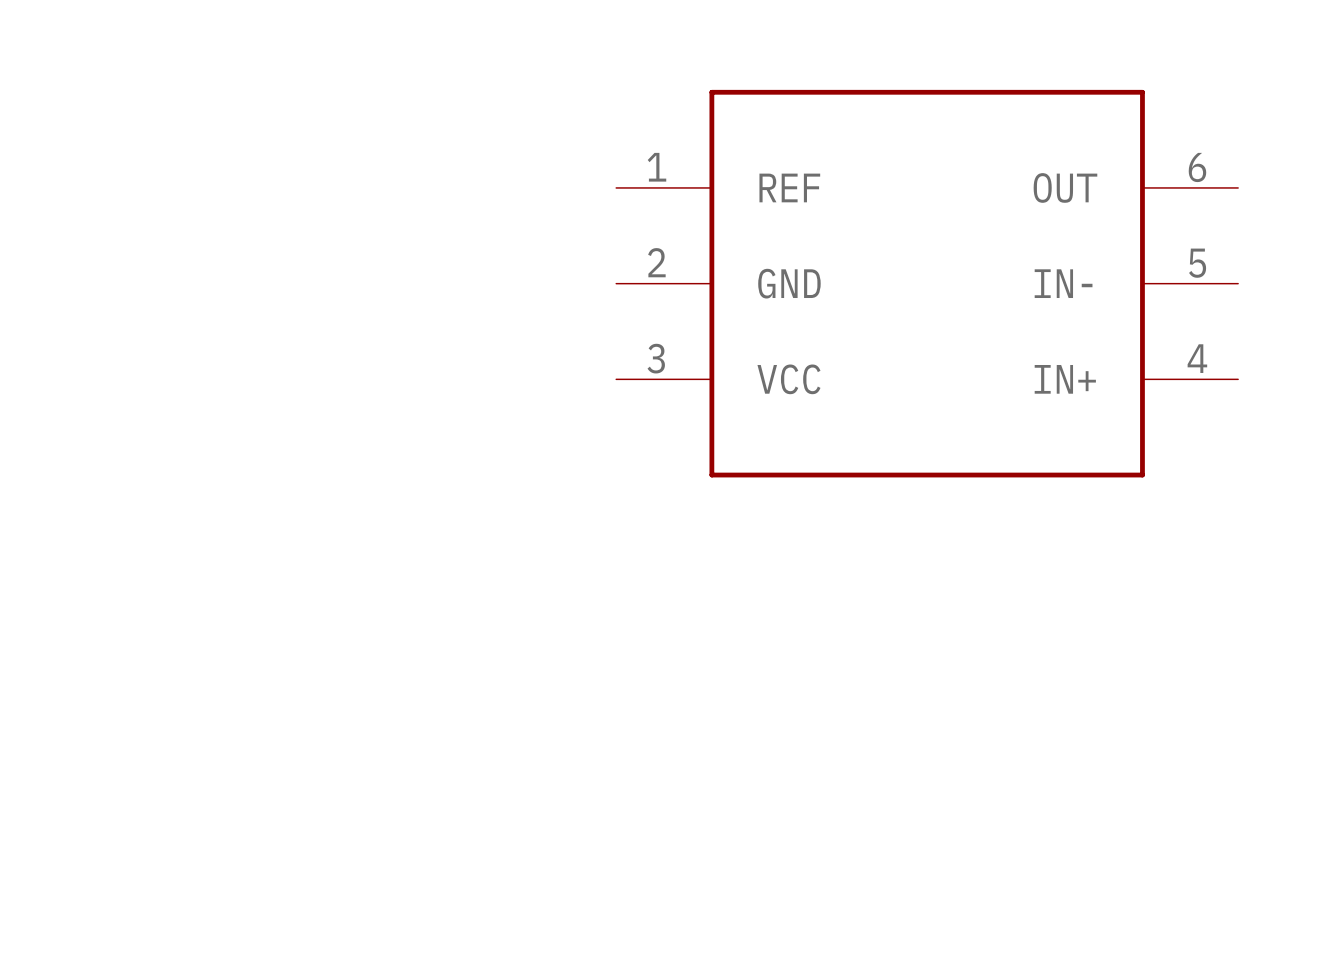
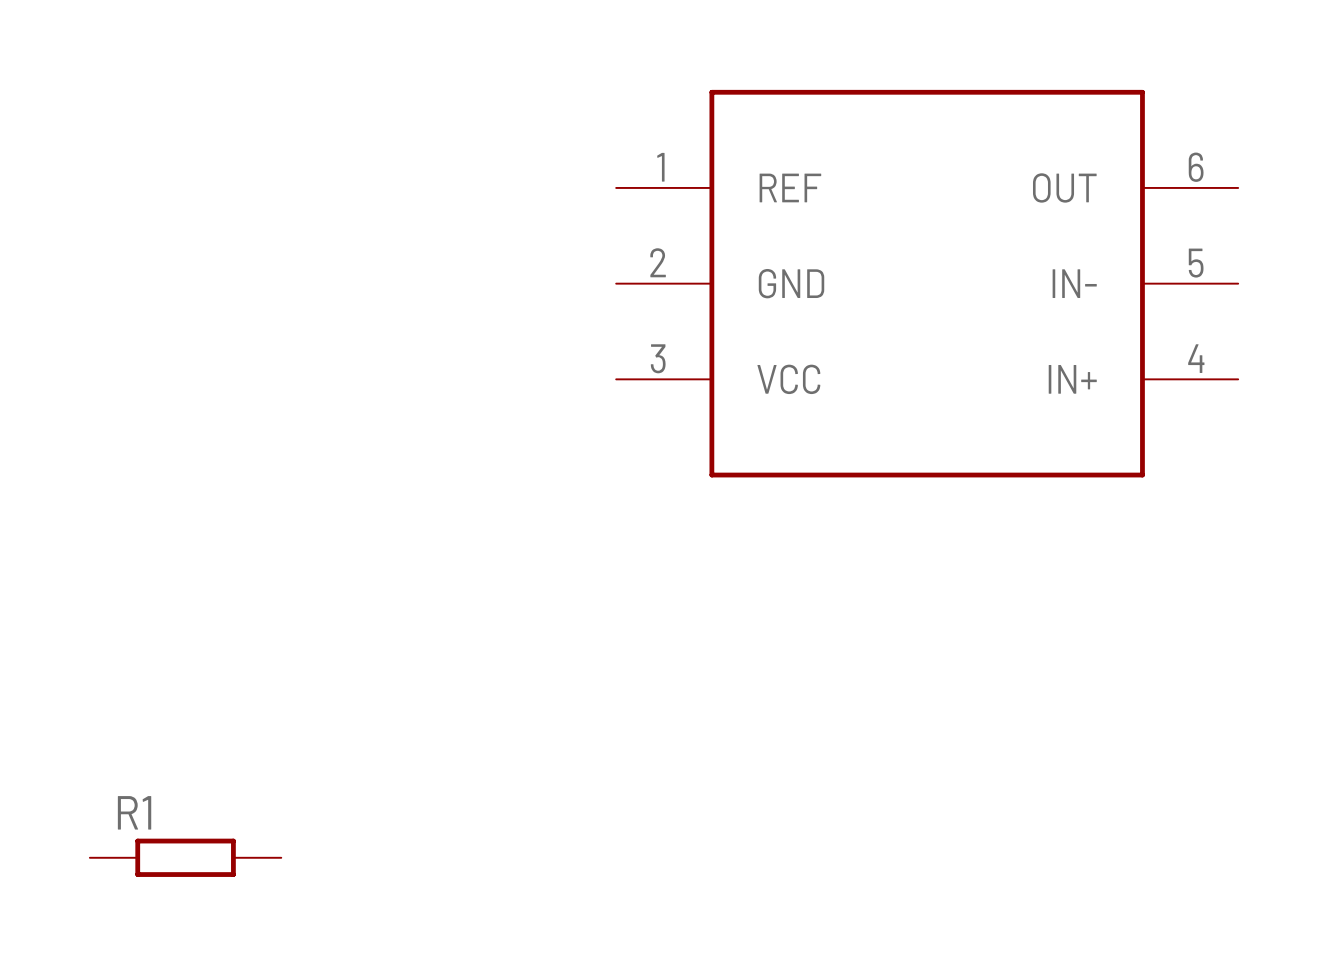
R1: none -> (185, 857)

